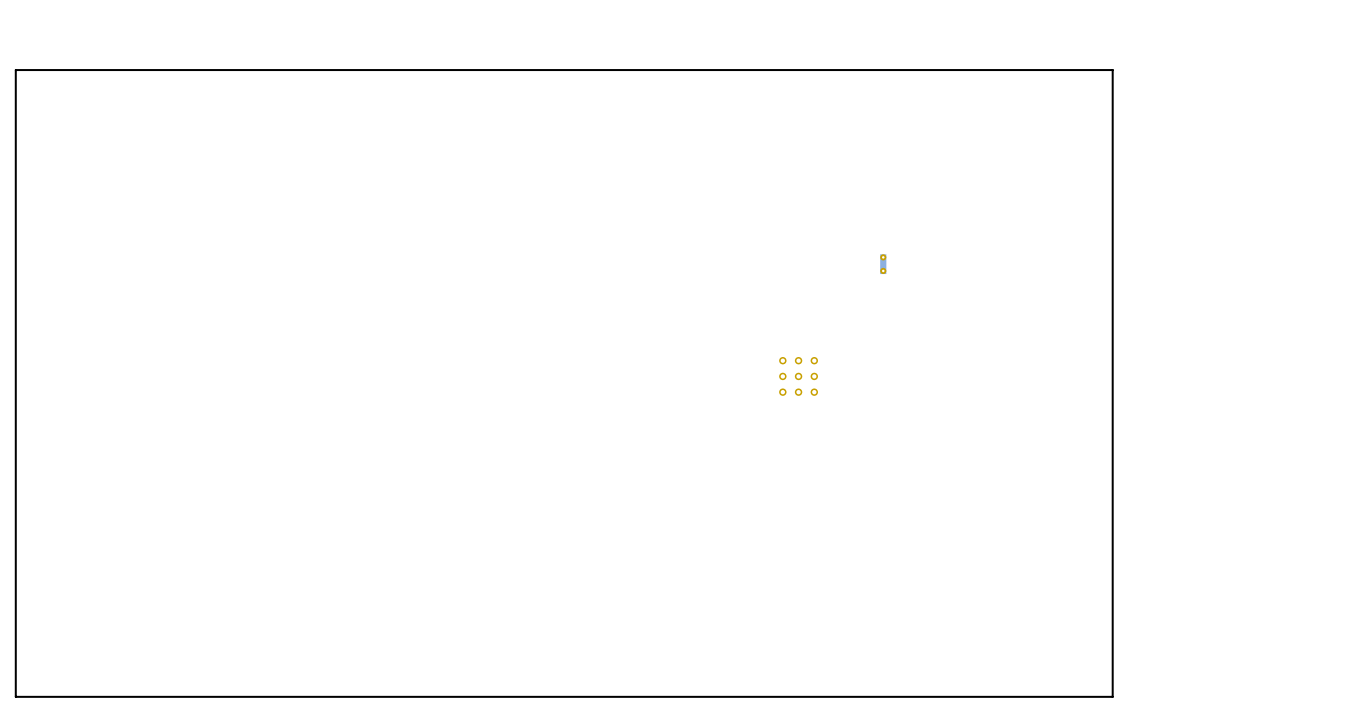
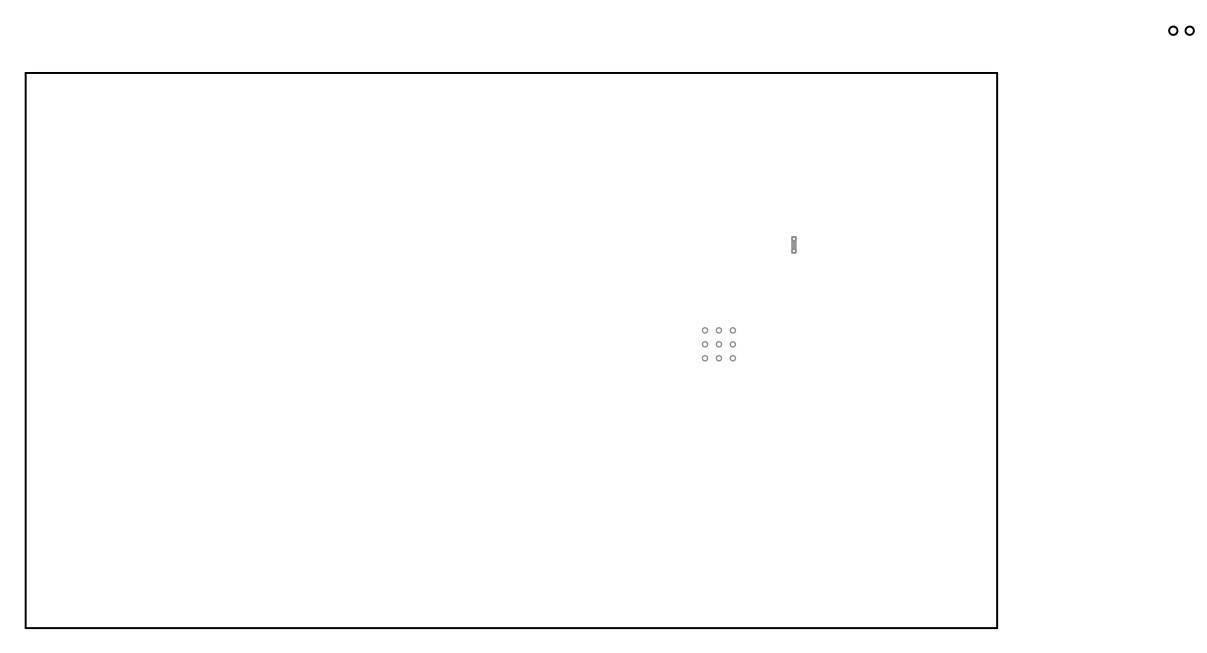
part: none -> (1181, 30)

